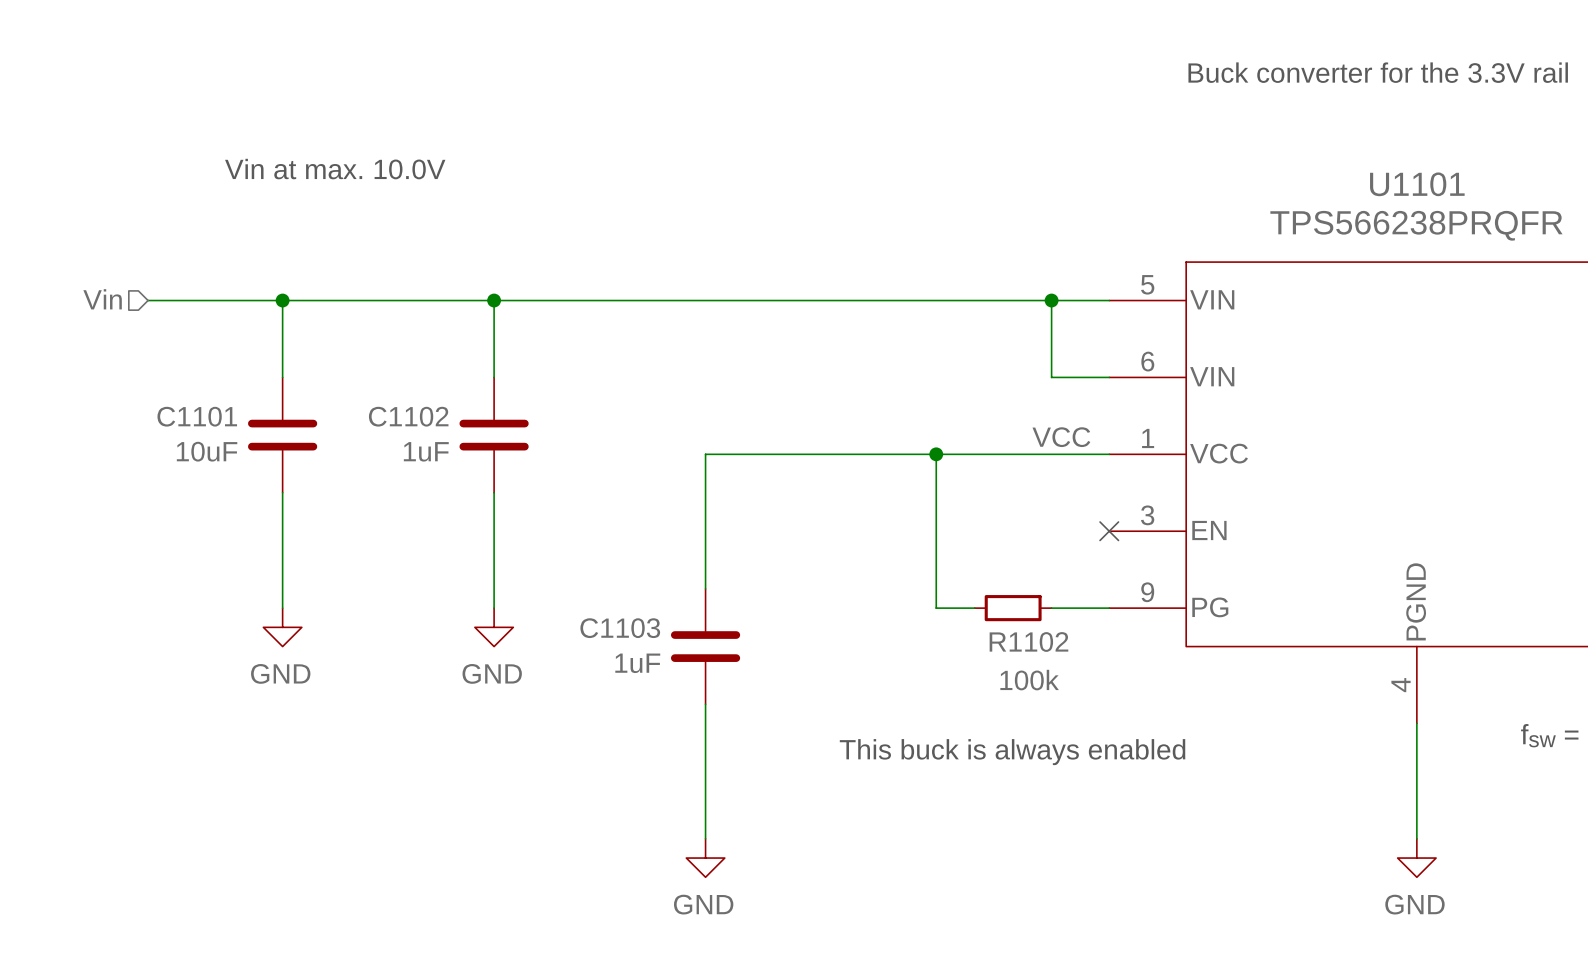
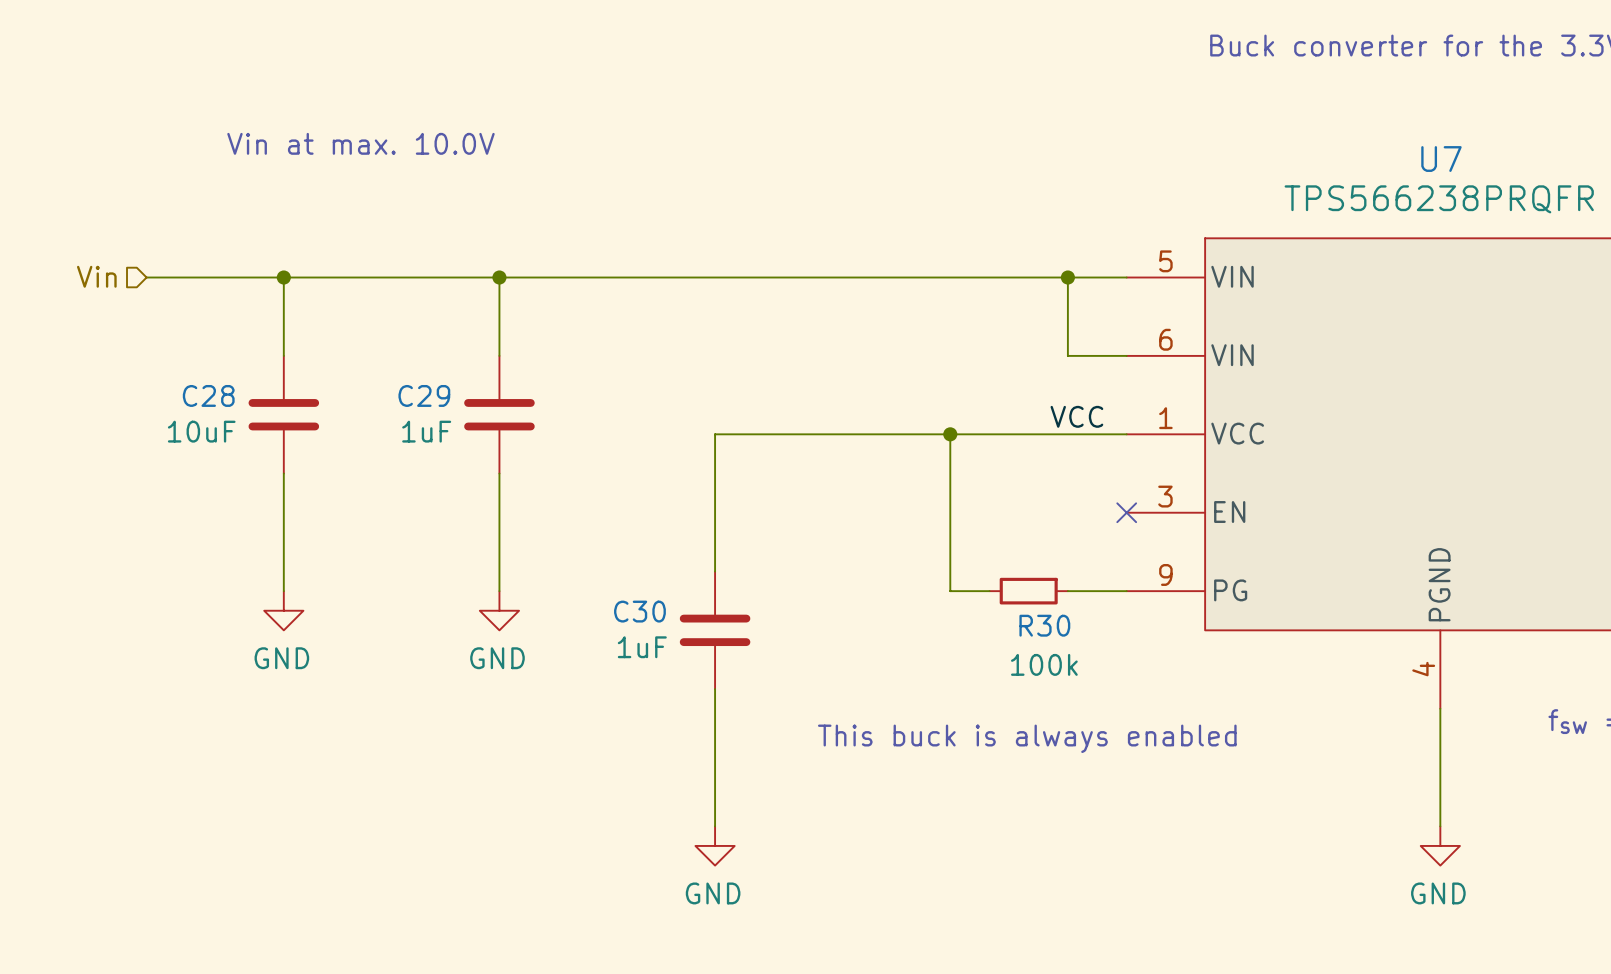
U1101 name: U1101 (1417, 184) -> U7 (1441, 159)
C1101 name: C1101 (197, 416) -> C28 (208, 395)
C1102 name: C1102 (408, 416) -> C29 (424, 395)
C1103 name: C1103 (620, 628) -> C30 (639, 611)
R1102 name: R1102 (1028, 642) -> R30 (1044, 625)

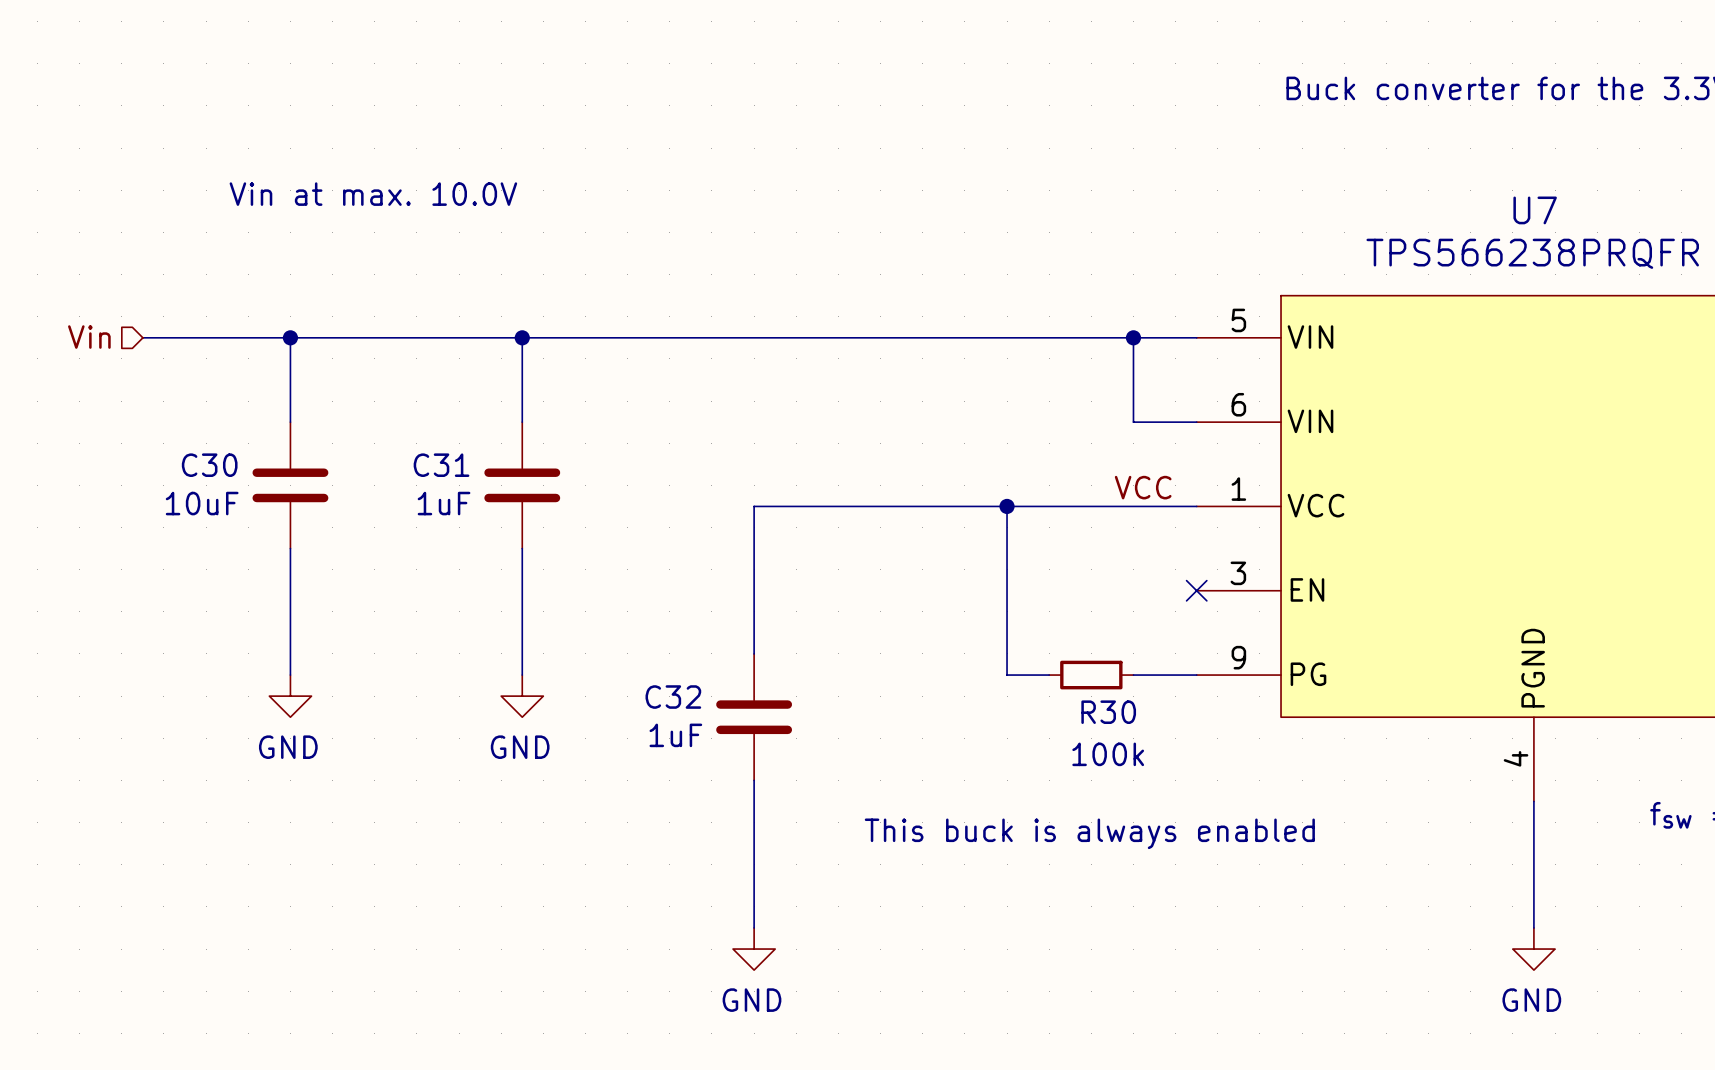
C28 name: C28 (208, 395) -> C30 (209, 465)
C29 name: C29 (424, 395) -> C31 (441, 465)
C30 name: C30 (639, 611) -> C32 (673, 697)

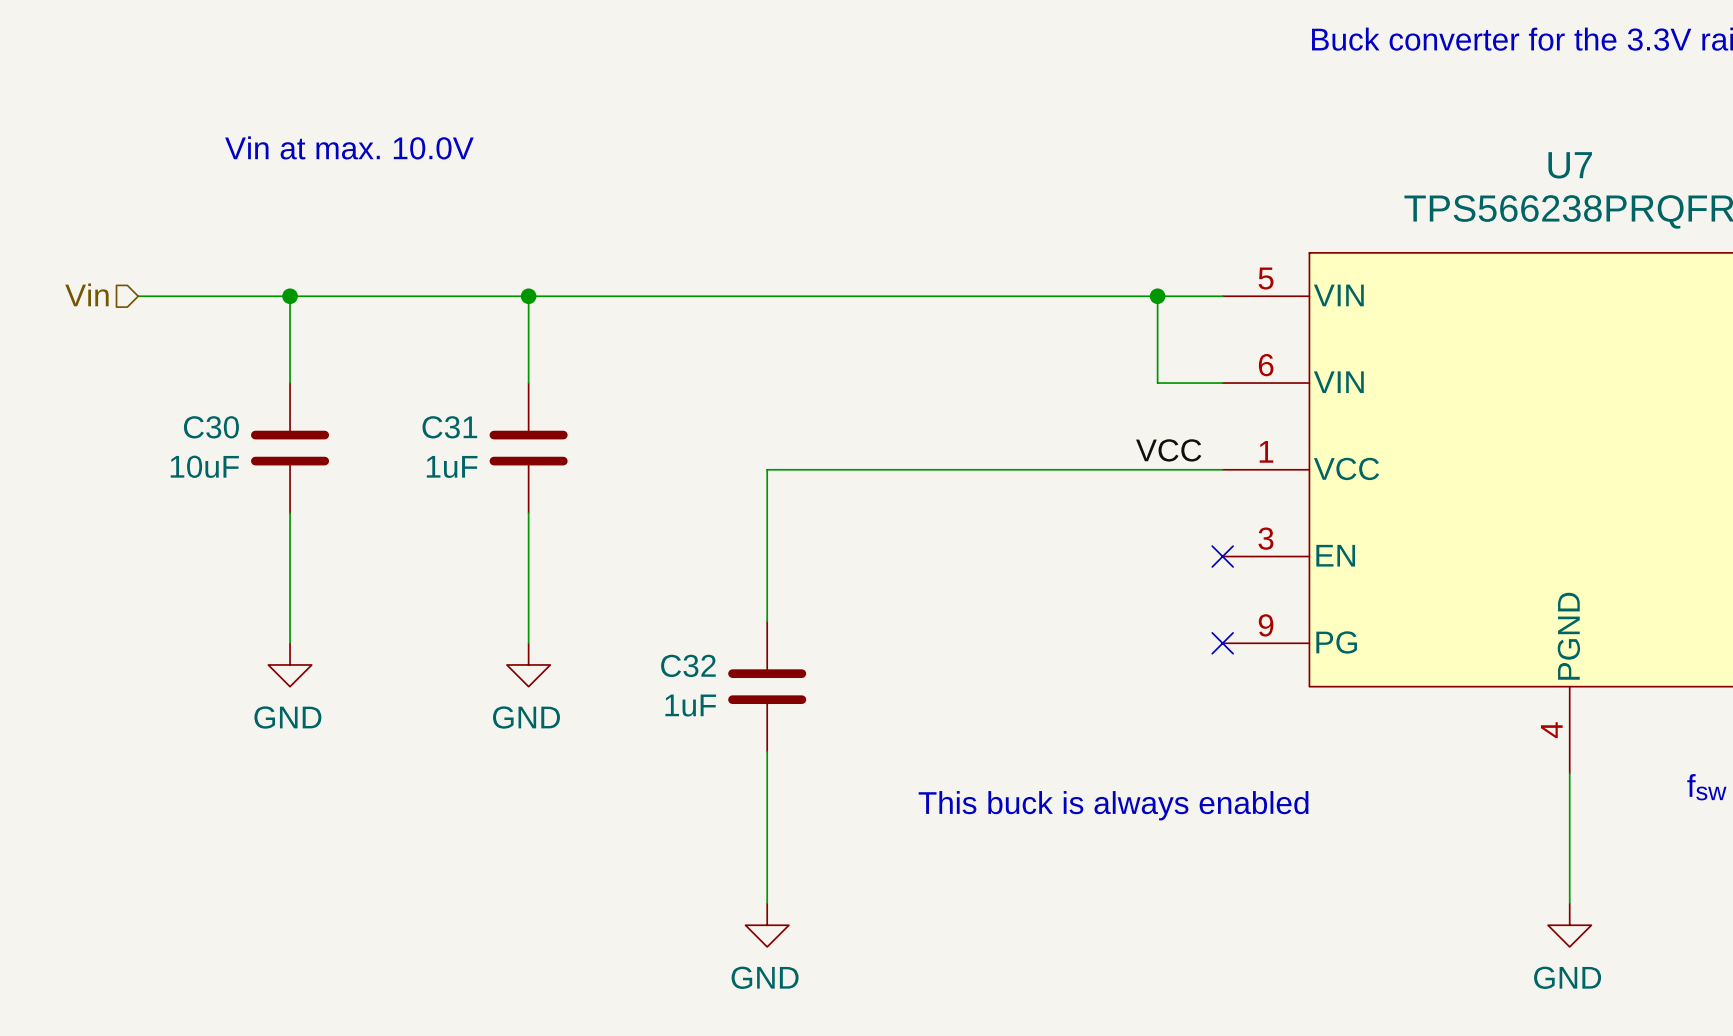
wire: (1007, 506) (1007, 675) (1049, 675) -> none
junction: (1007, 506) -> none
R30: 100k (1091, 675) -> none
wire: (1133, 675) (1196, 675) -> none
no-connect mark: none -> (1222, 643)

